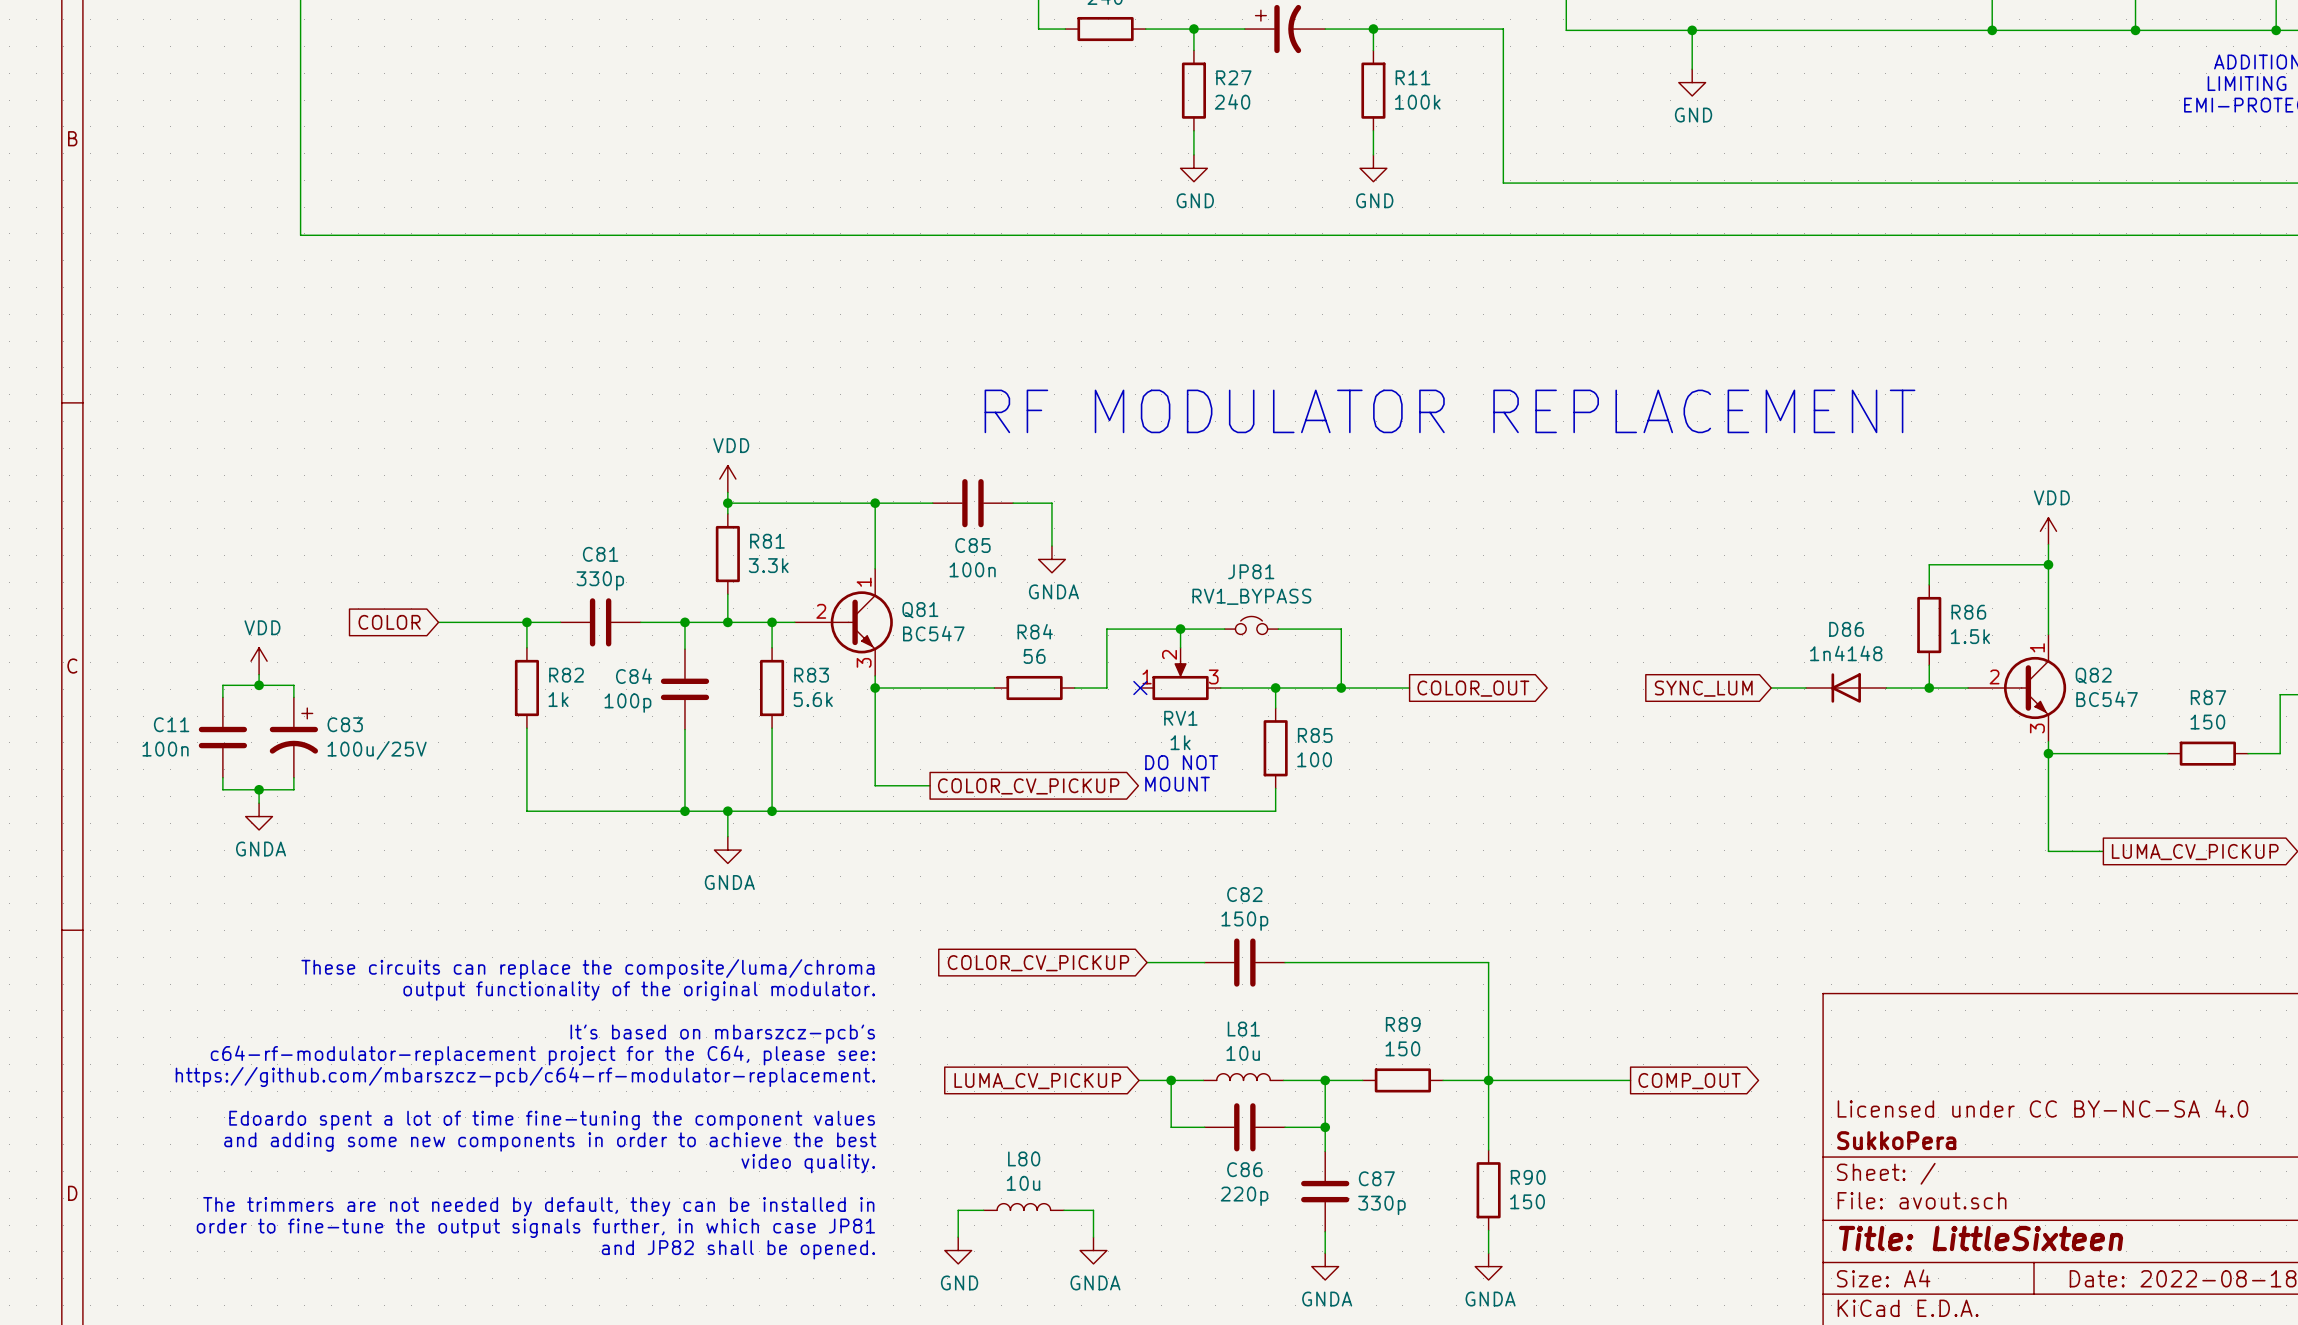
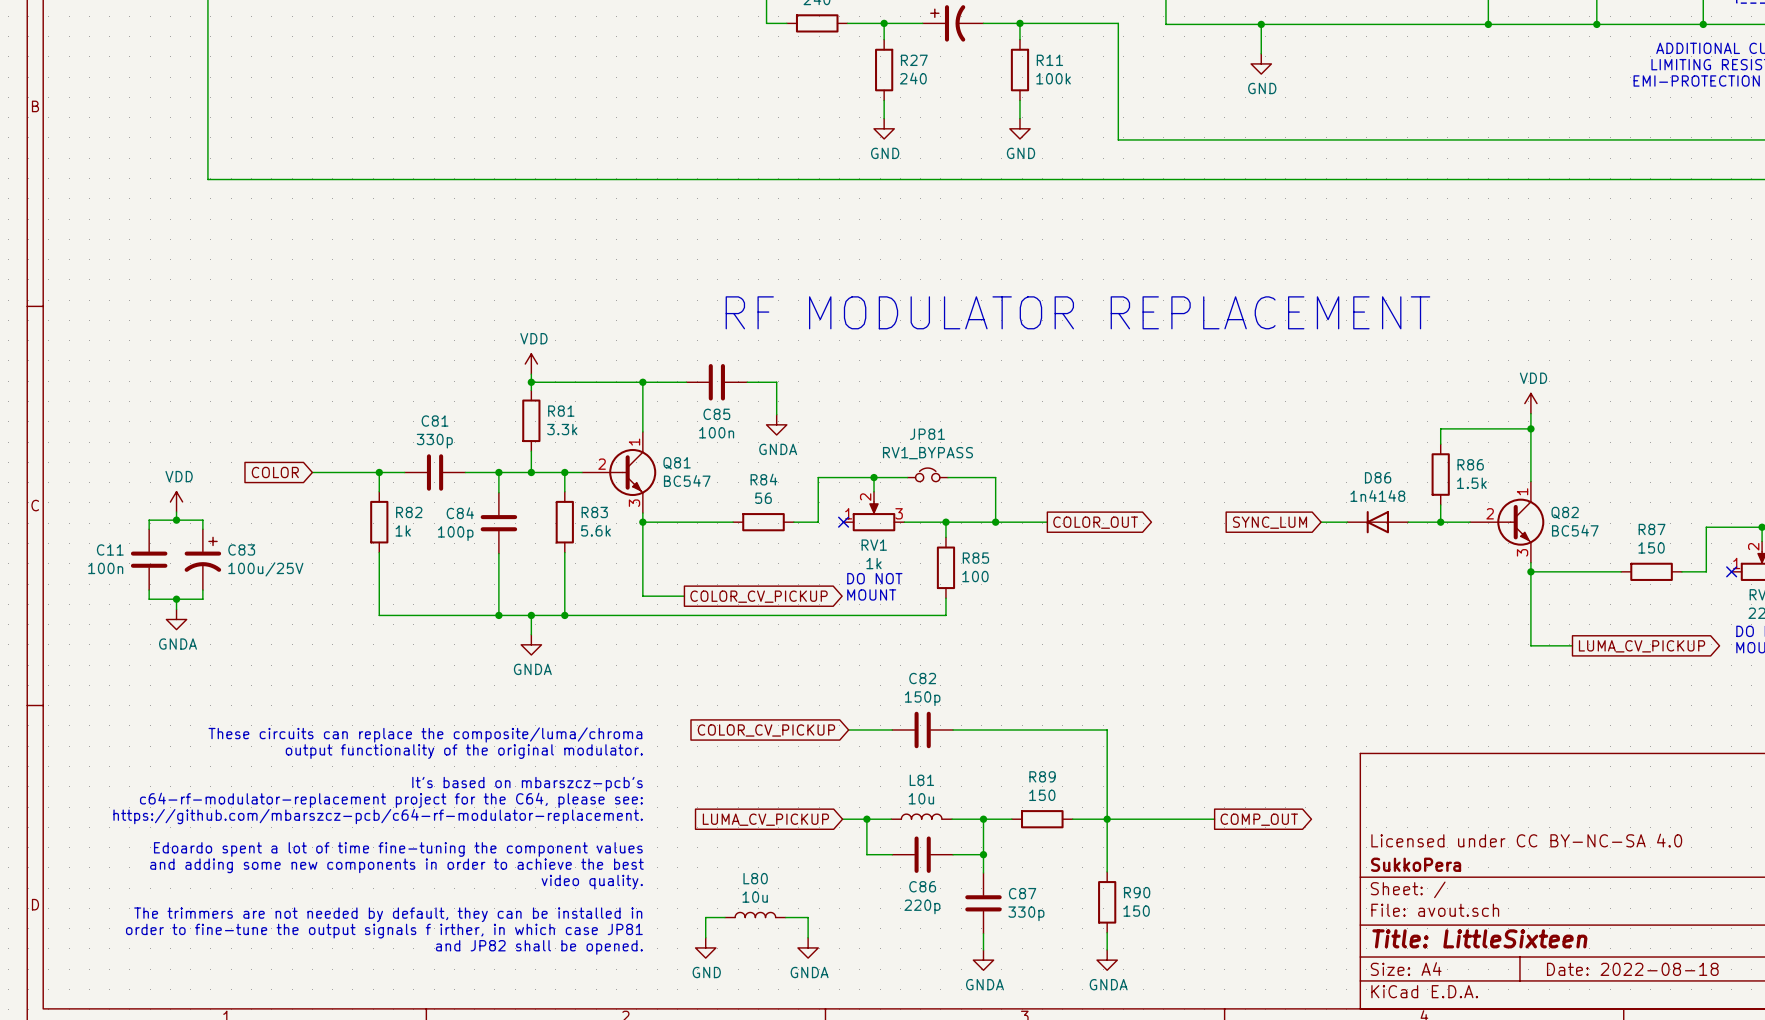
text: order to fine-tune the output signals further, in which case JP81 (535, 1228) -> order to fine-tune the output signals f irther, in which case JP81 (384, 931)

